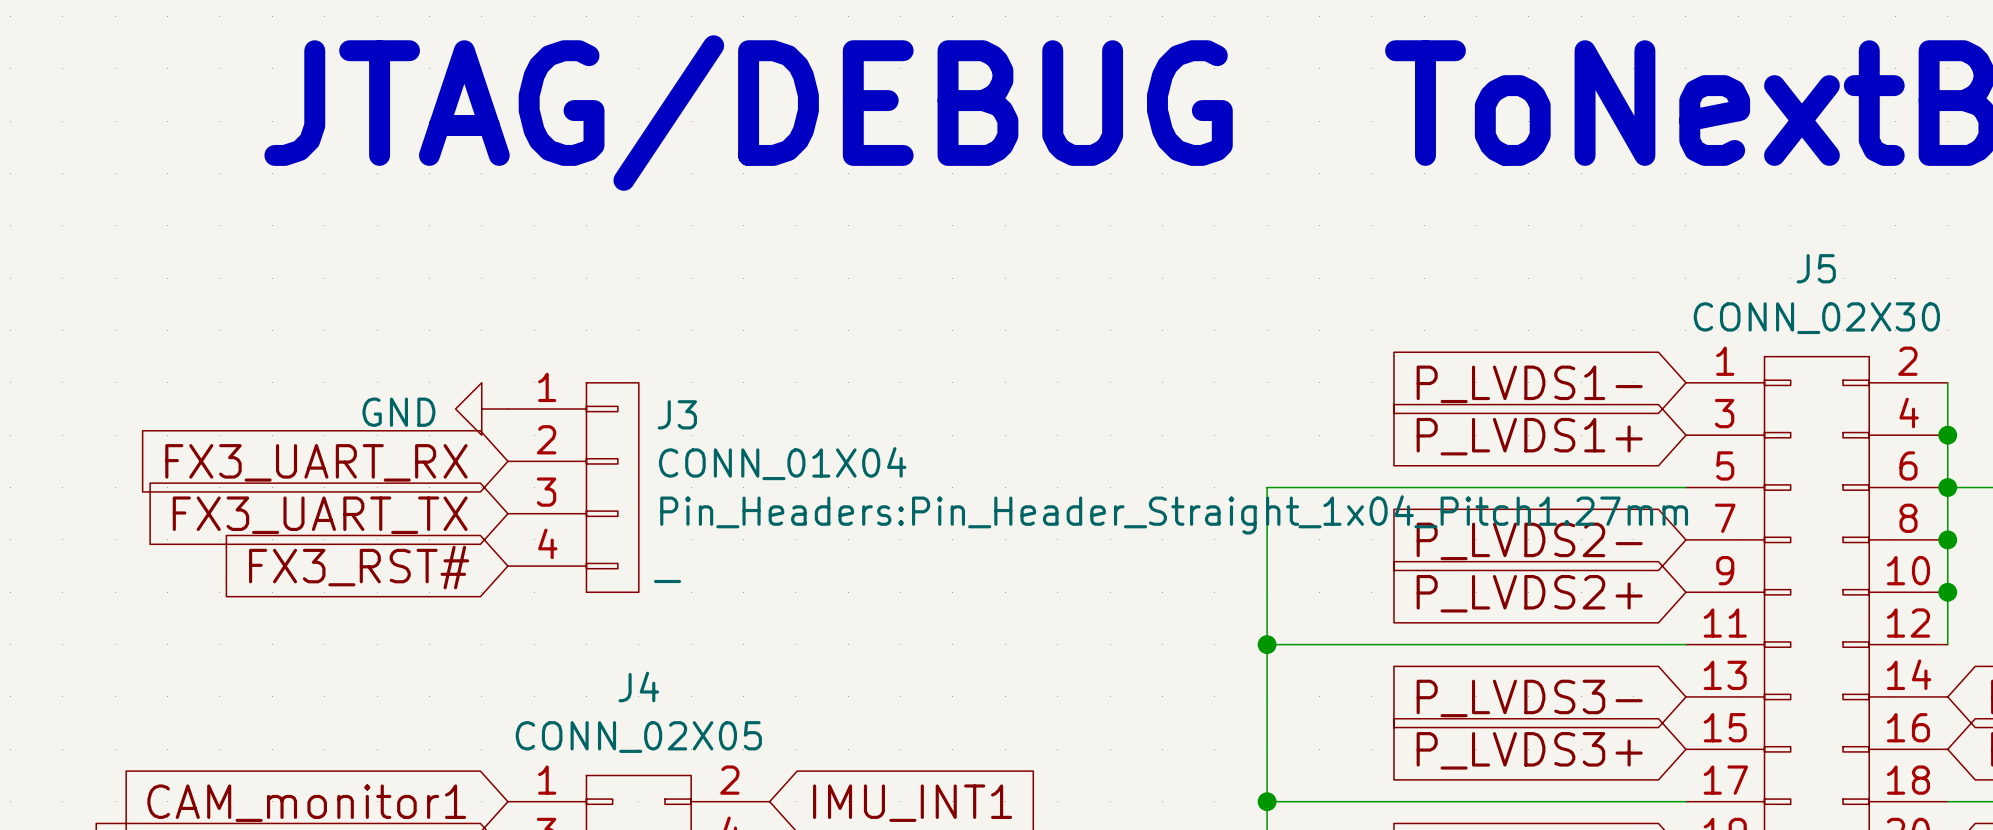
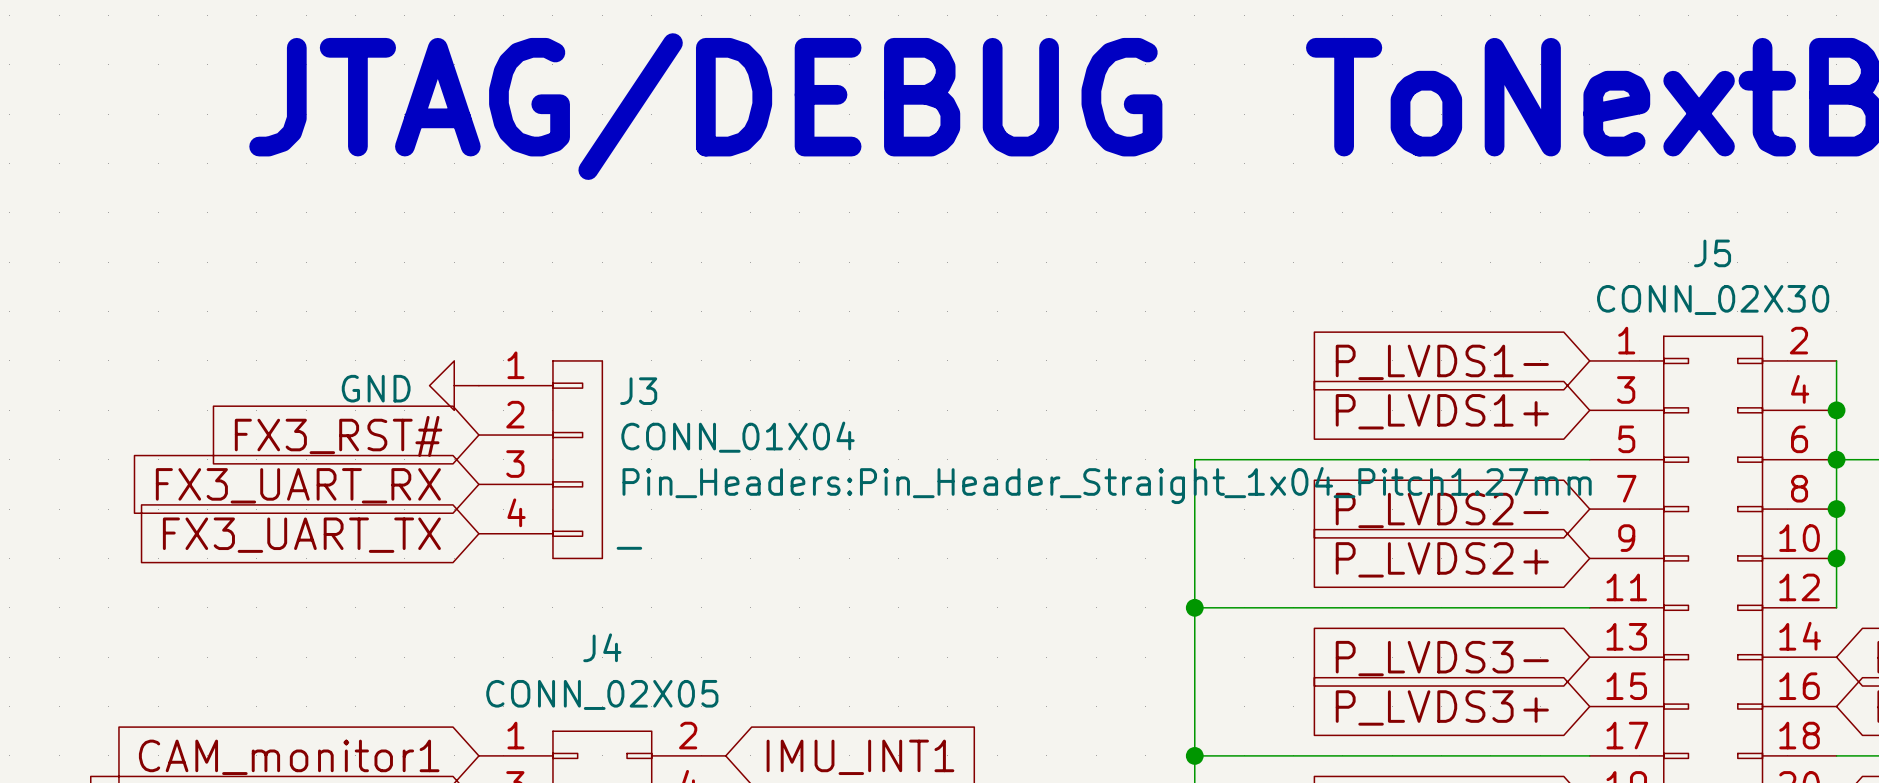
global label: FX3_UART_RX (316, 462) -> FX3_RST# (338, 436)
global label: FX3_UART_TX (320, 515) -> FX3_UART_RX (298, 485)
global label: FX3_RST# (359, 567) -> FX3_UART_TX (301, 535)

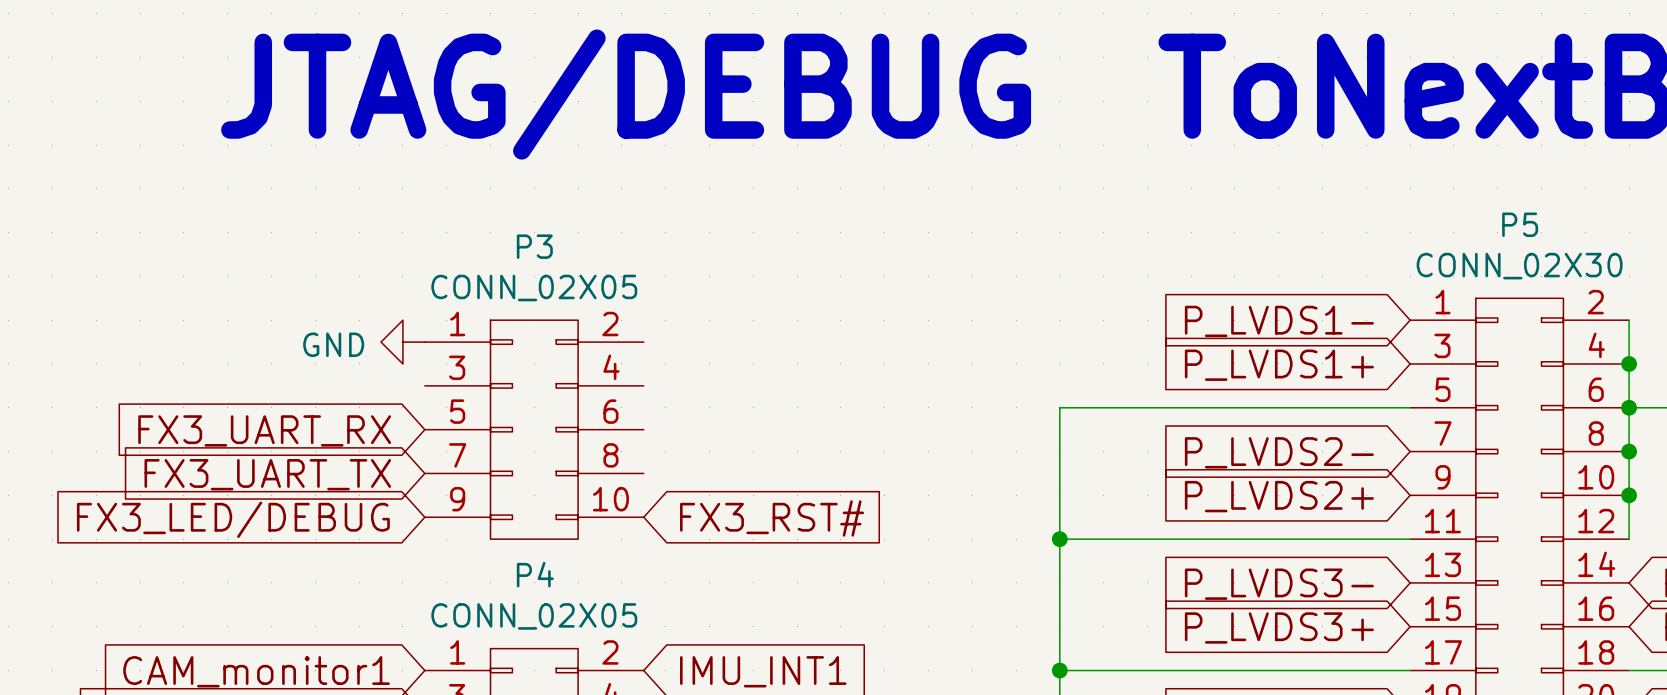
J5 name: J5 (1712, 253) -> P5 (1520, 224)
global label rotation: 0° (338, 436) -> 180° (772, 518)
global label position: FX3_RST# (338, 436) -> FX3_RST# (772, 518)
J3: CONN_01X04 (540, 459) -> none
P3: none -> CONN_02X05 (534, 429)
global label: none -> FX3_LED/DEBUG (233, 519)
J4 name: J4 (602, 647) -> P4 (535, 574)

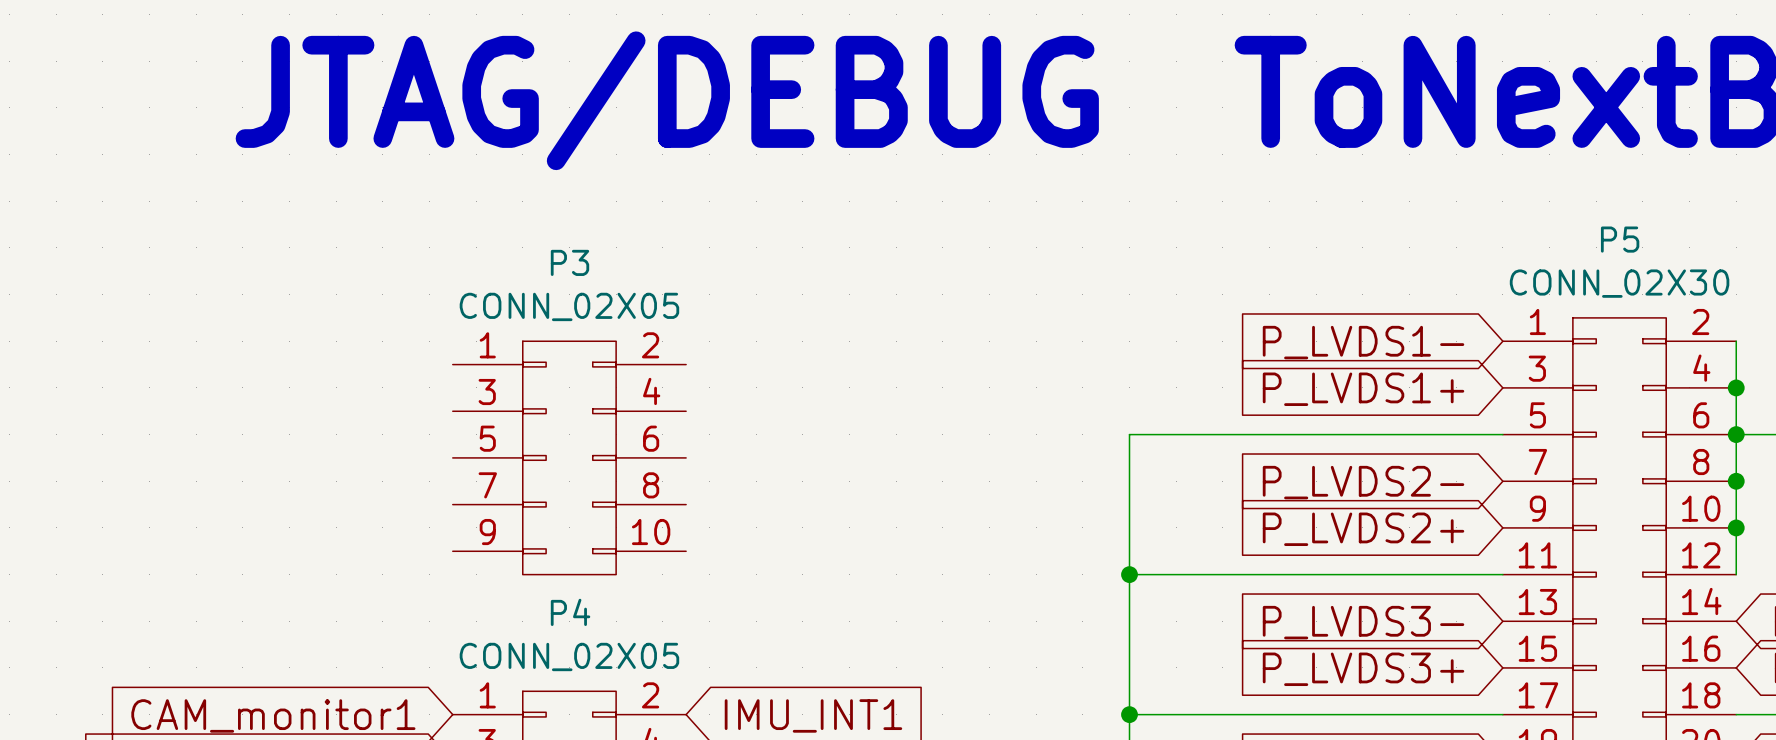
power symbol: GND (402, 342) -> none
global label: FX3_UART_RX (264, 430) -> none
global label: FX3_UART_TX (267, 474) -> none
global label: FX3_RST# (772, 518) -> none
global label: FX3_LED/DEBUG (233, 519) -> none

